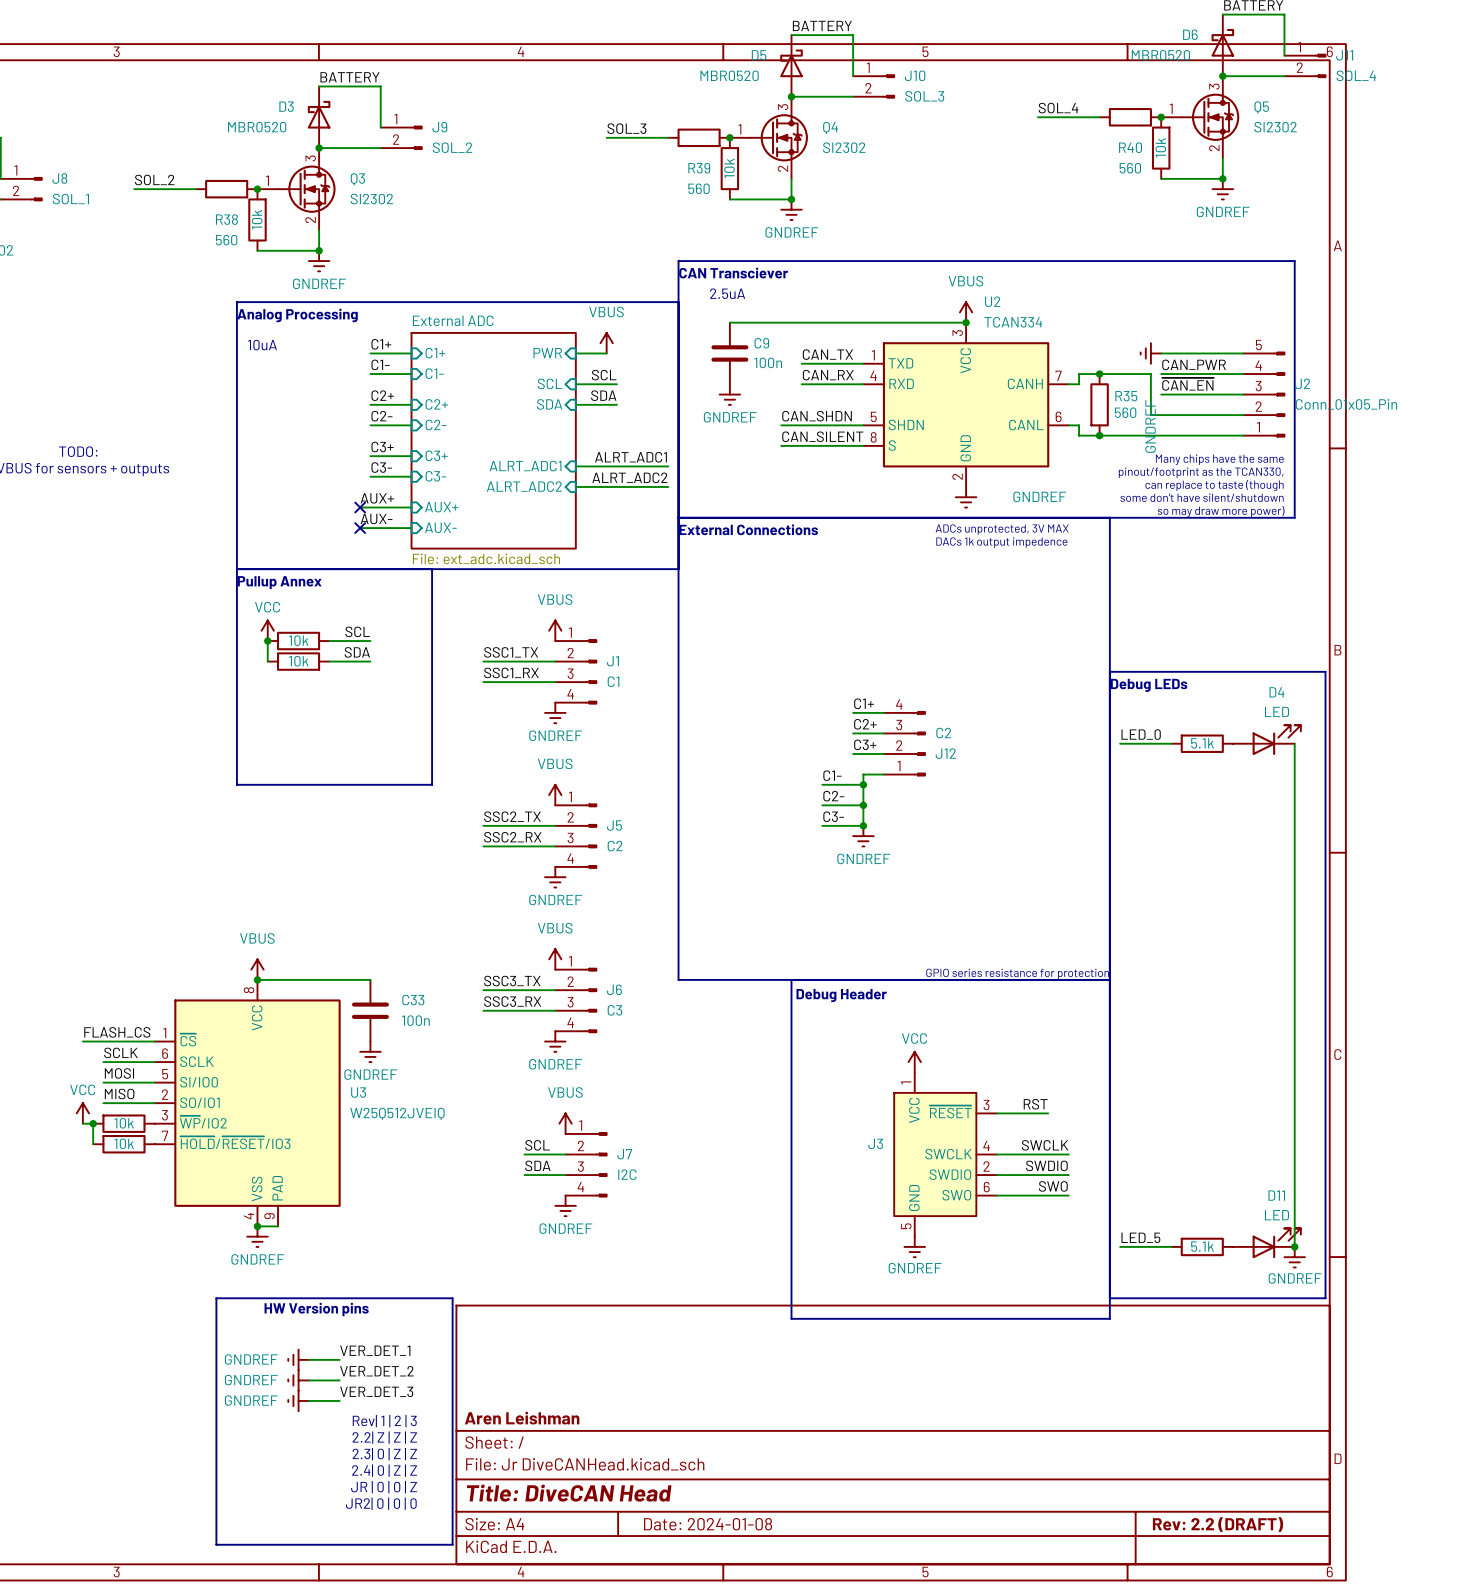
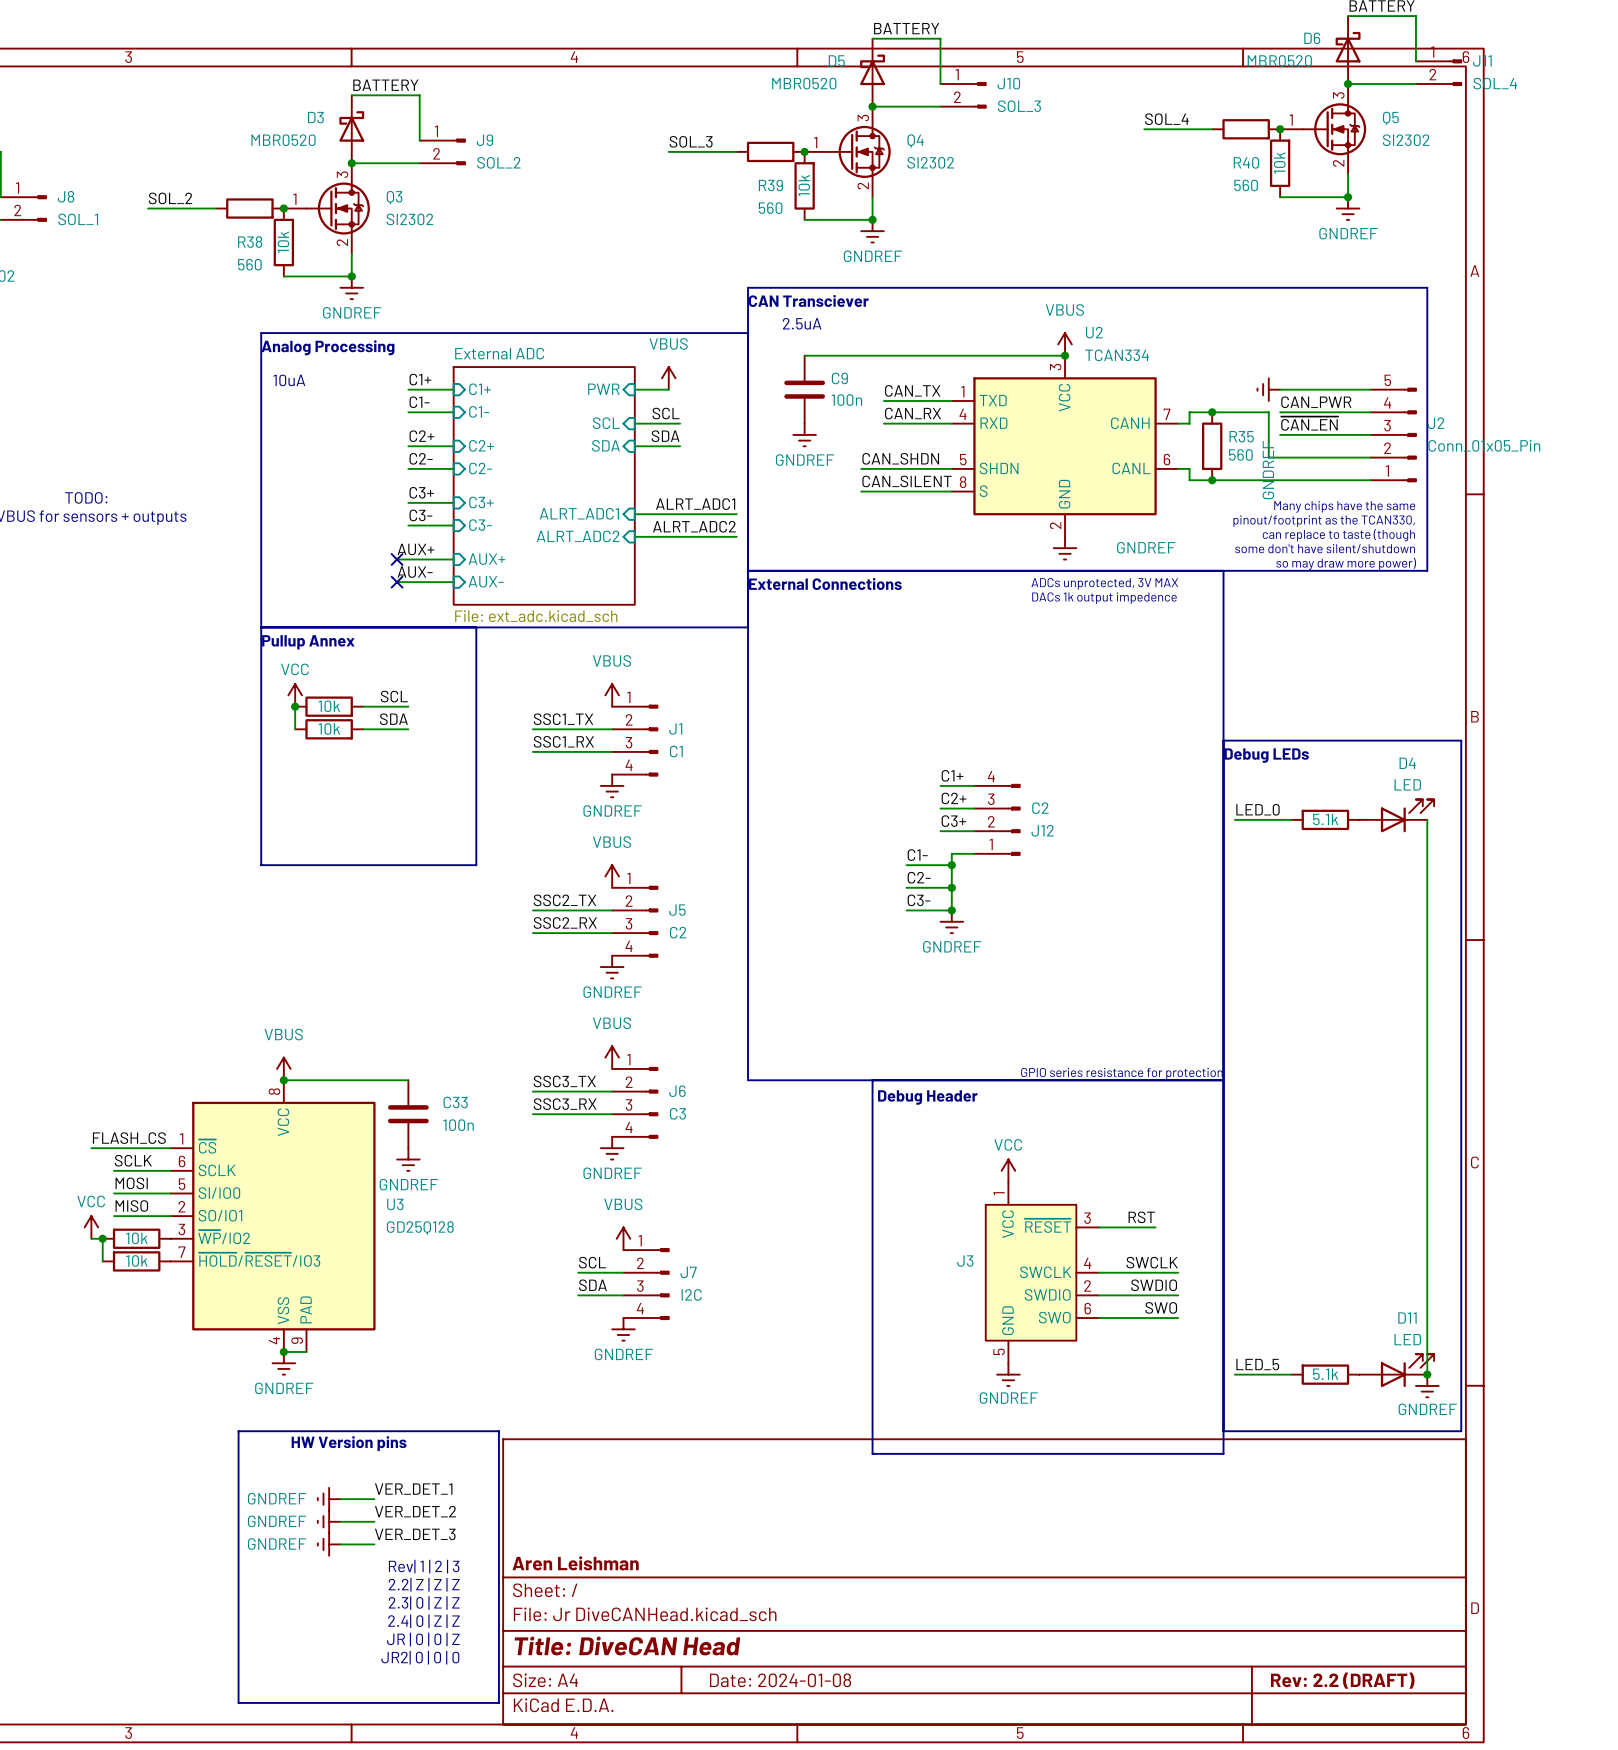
U3 value: W25Q512JVEIQ (397, 1113) -> GD25Q128 (420, 1227)

